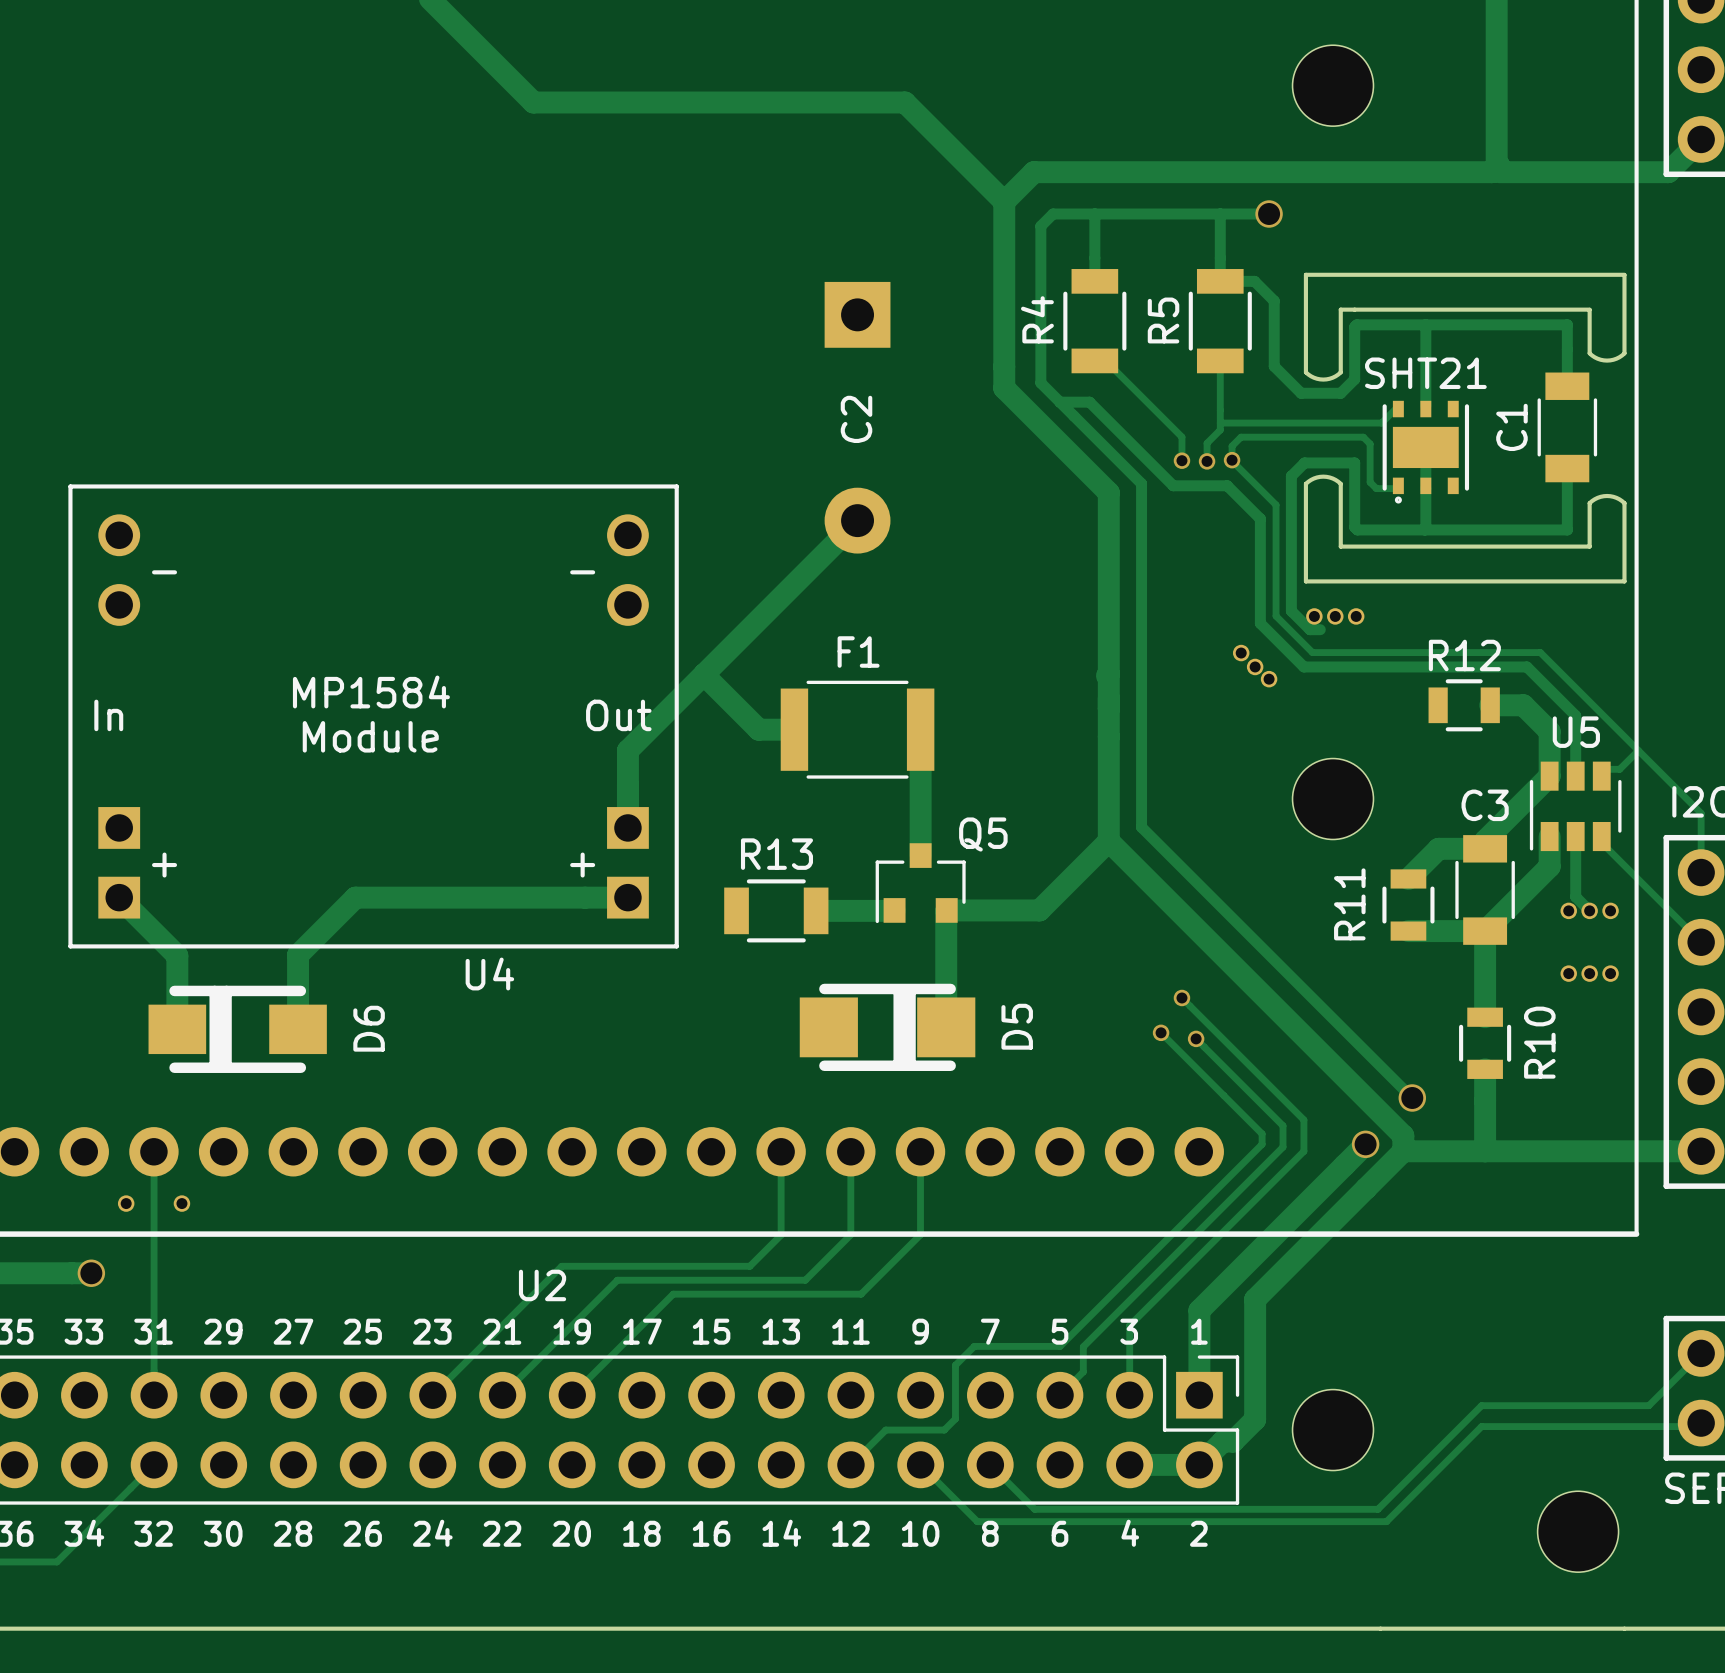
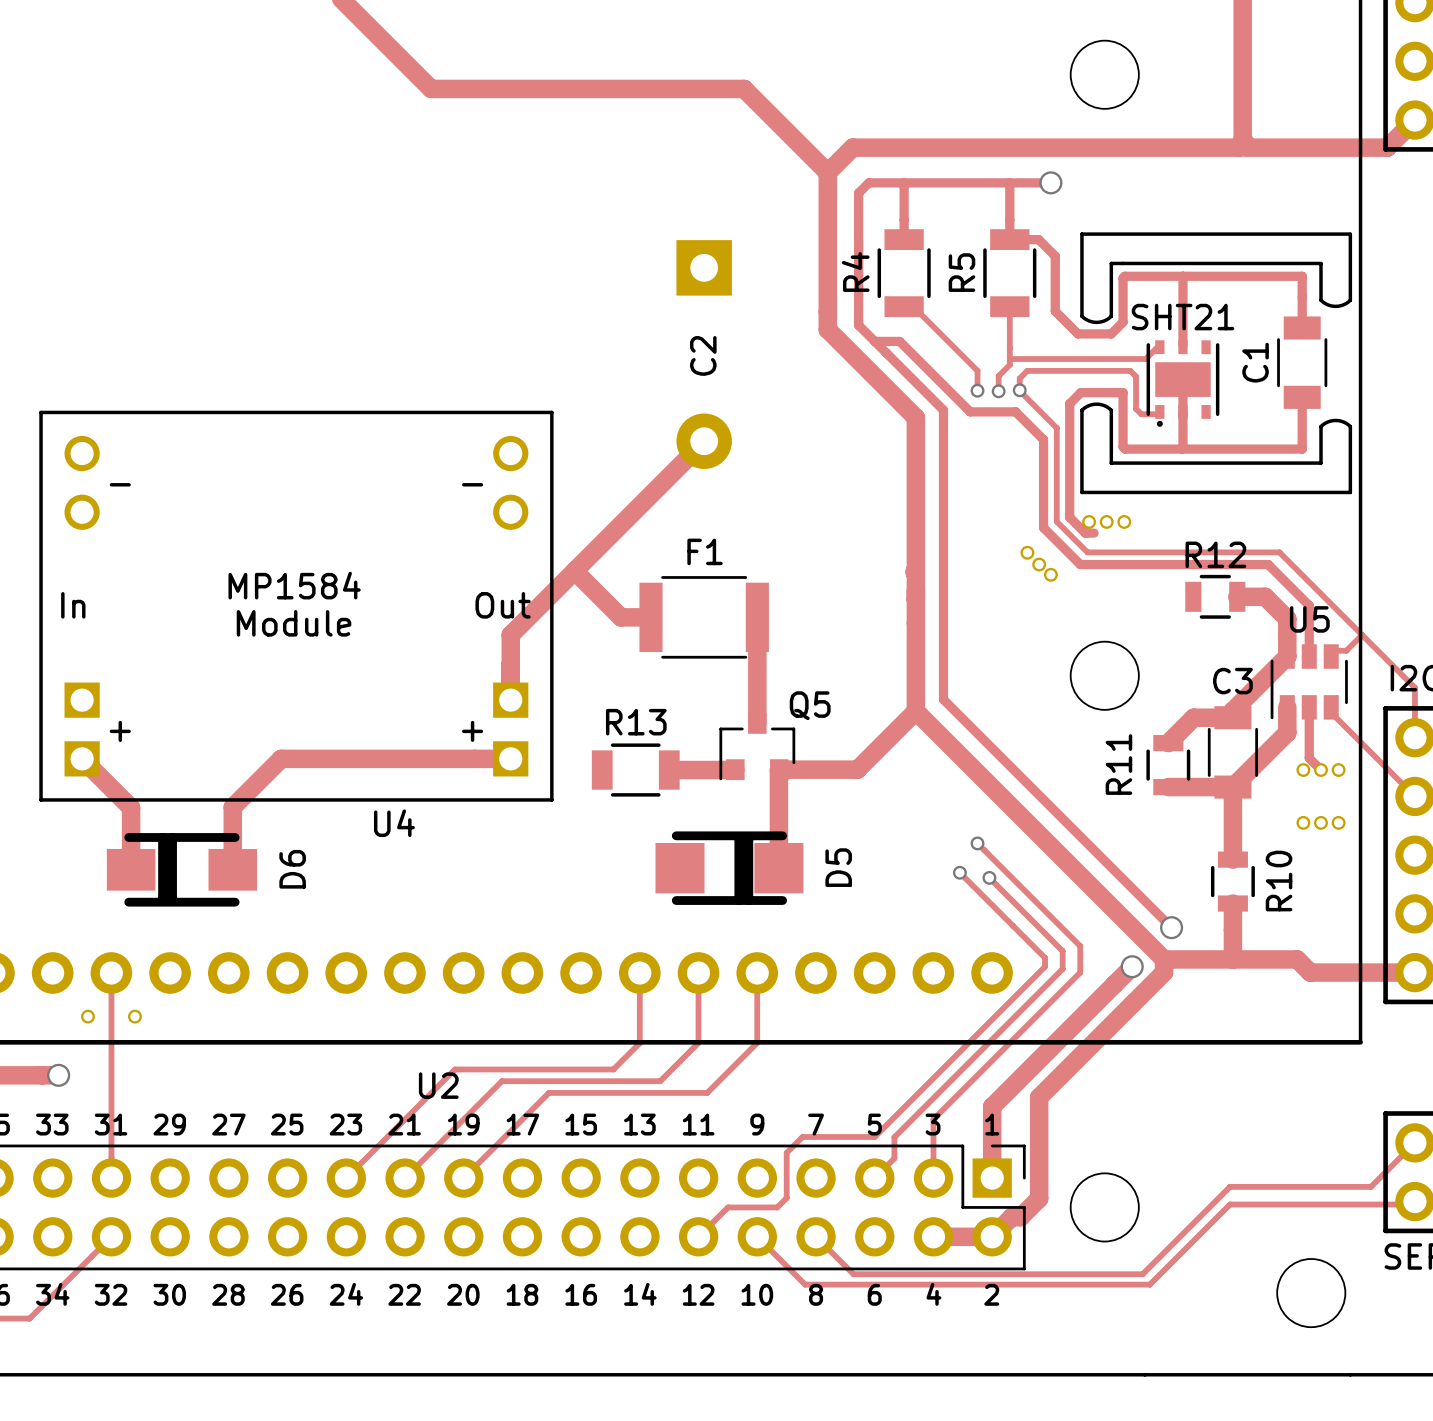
track: (1403, 1151) (1668, 1151) -> (1164, 959) (1297, 959) (1310, 972) (1387, 972)

